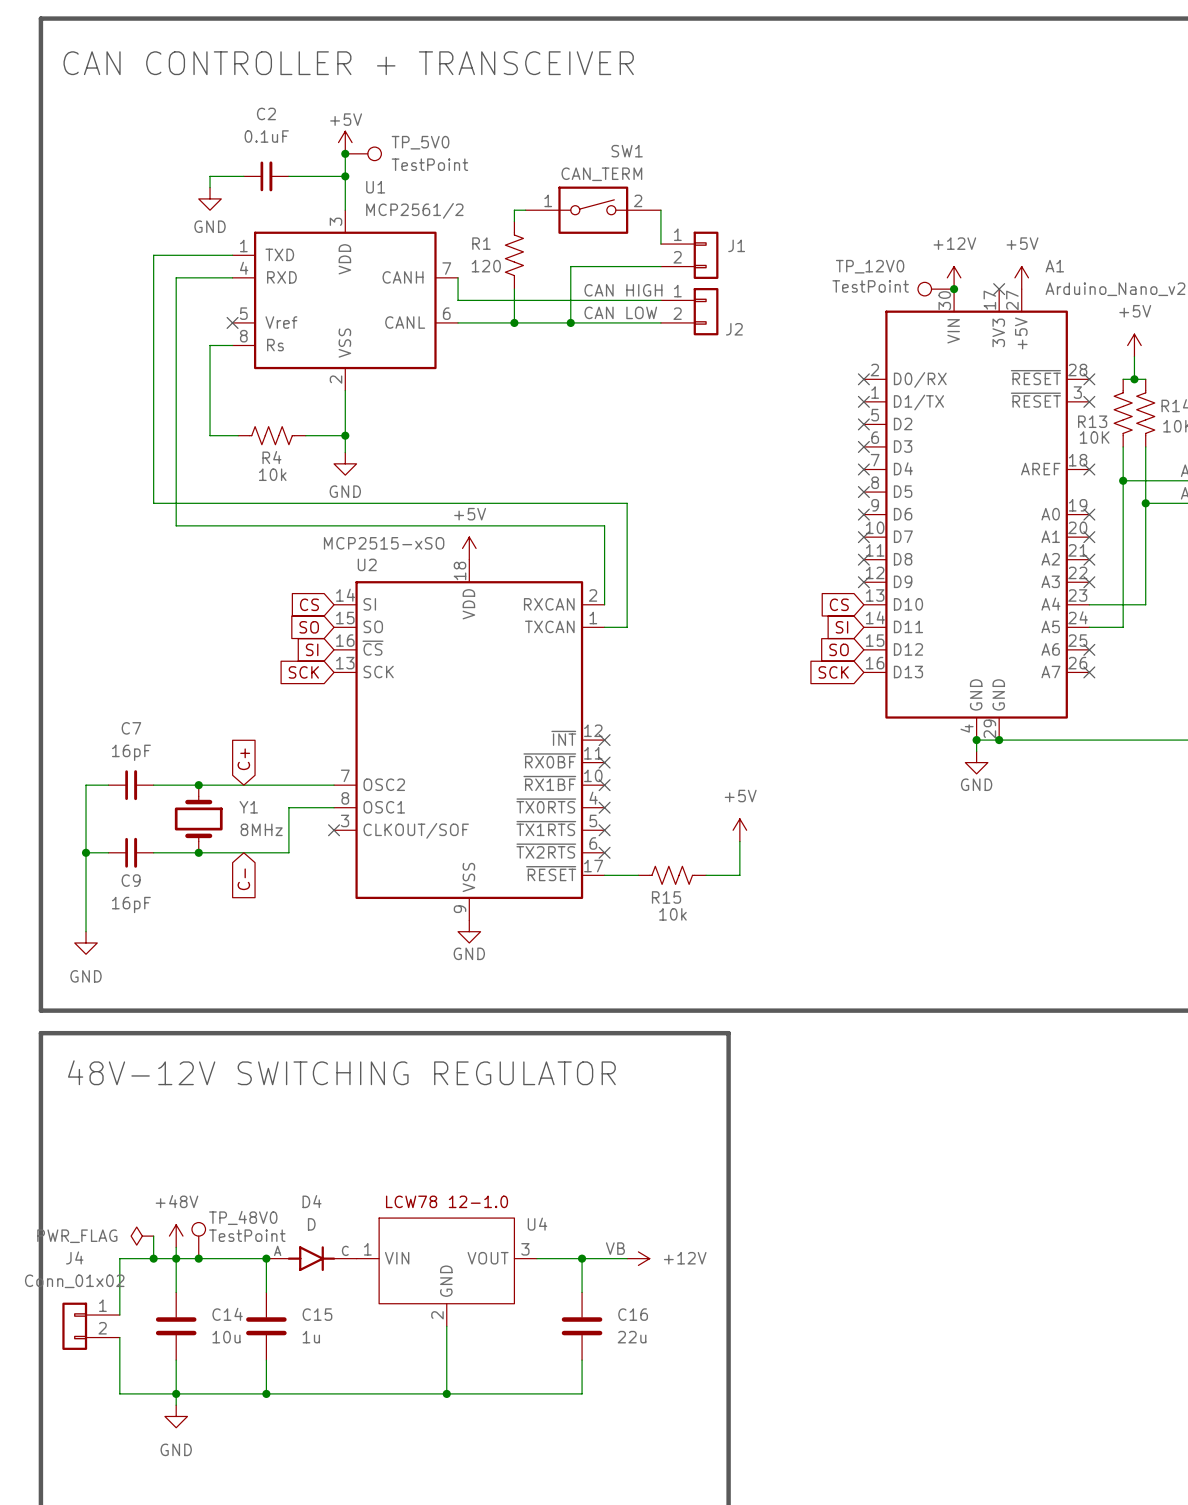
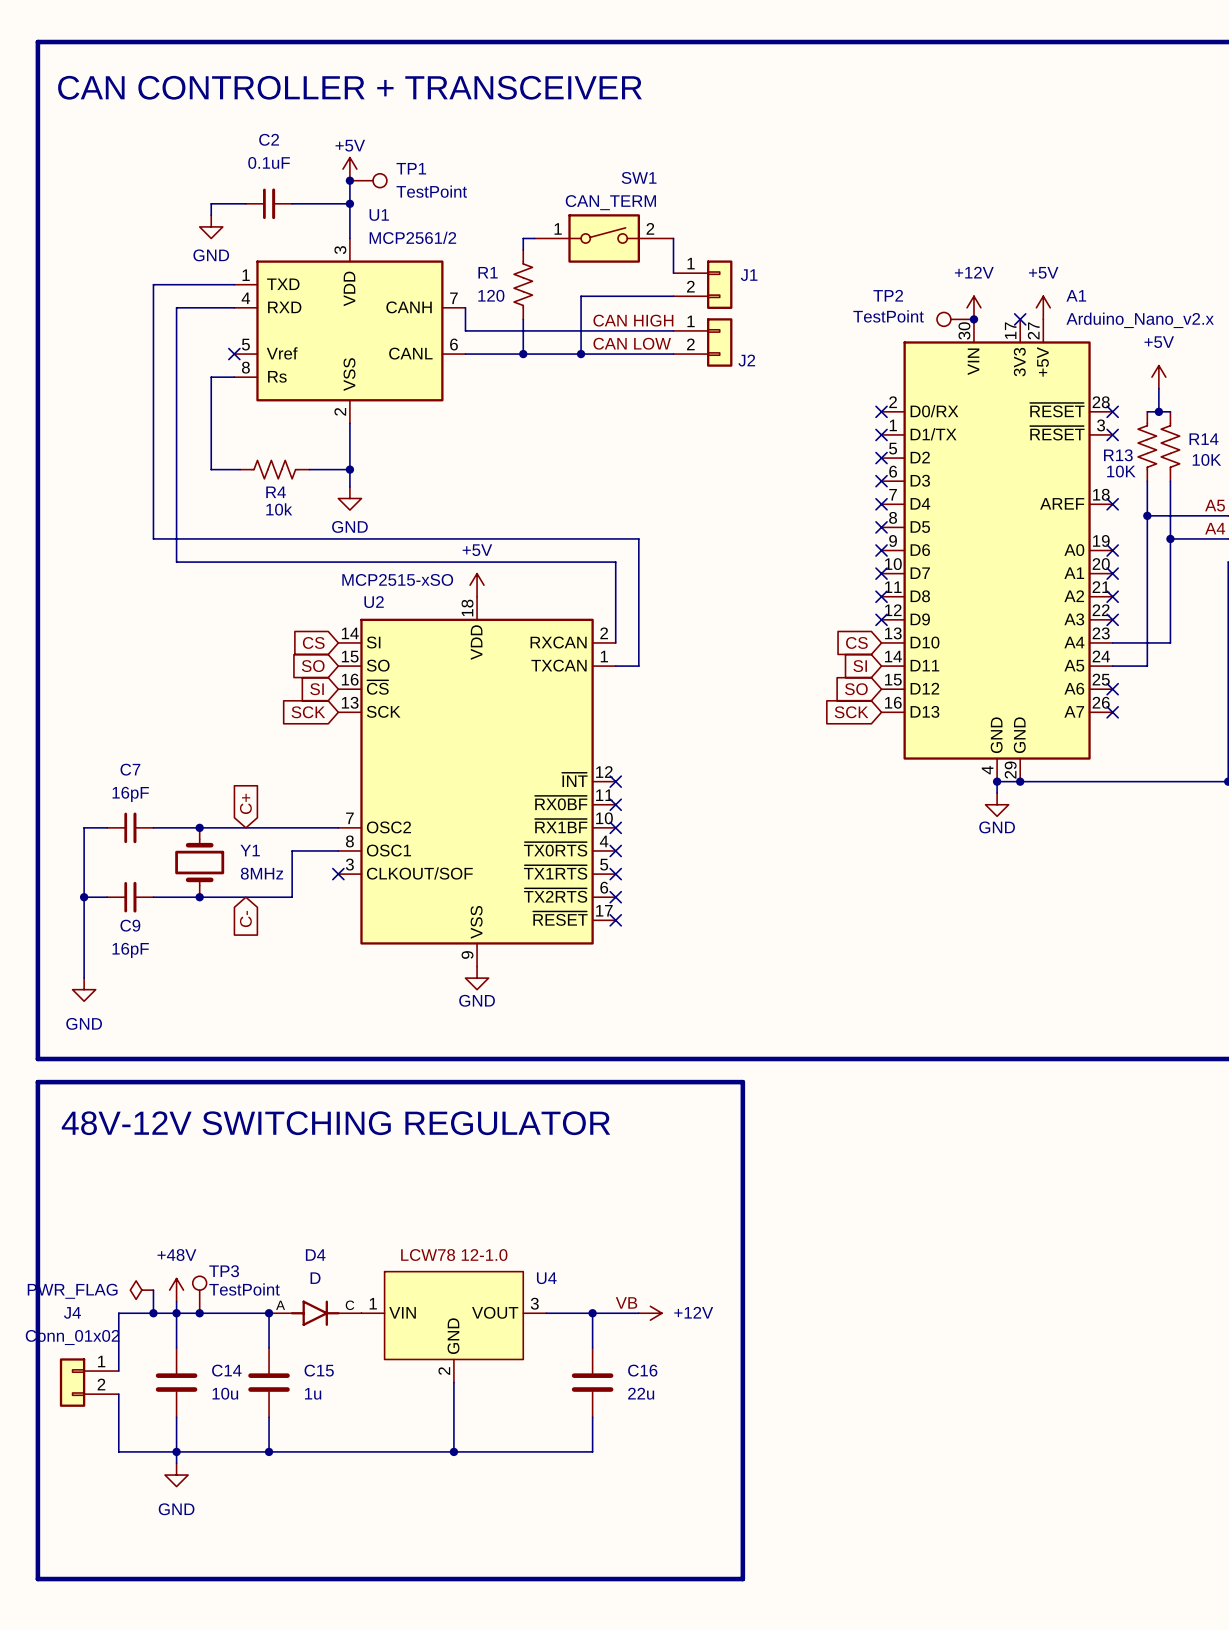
TP_5V0 name: TP_5V0 (420, 142) -> TP1 (411, 168)
TP_12V0 name: TP_12V0 (870, 266) -> TP2 (888, 295)
power symbol: +5V (739, 830) -> none
wire: (739, 841) (739, 875) (706, 875) -> none
wire: (604, 875) (638, 875) -> none
no-connect mark: none -> (615, 920)
R15: 10k (672, 875) -> none
TP_48V0 name: TP_48V0 (243, 1217) -> TP3 (224, 1271)

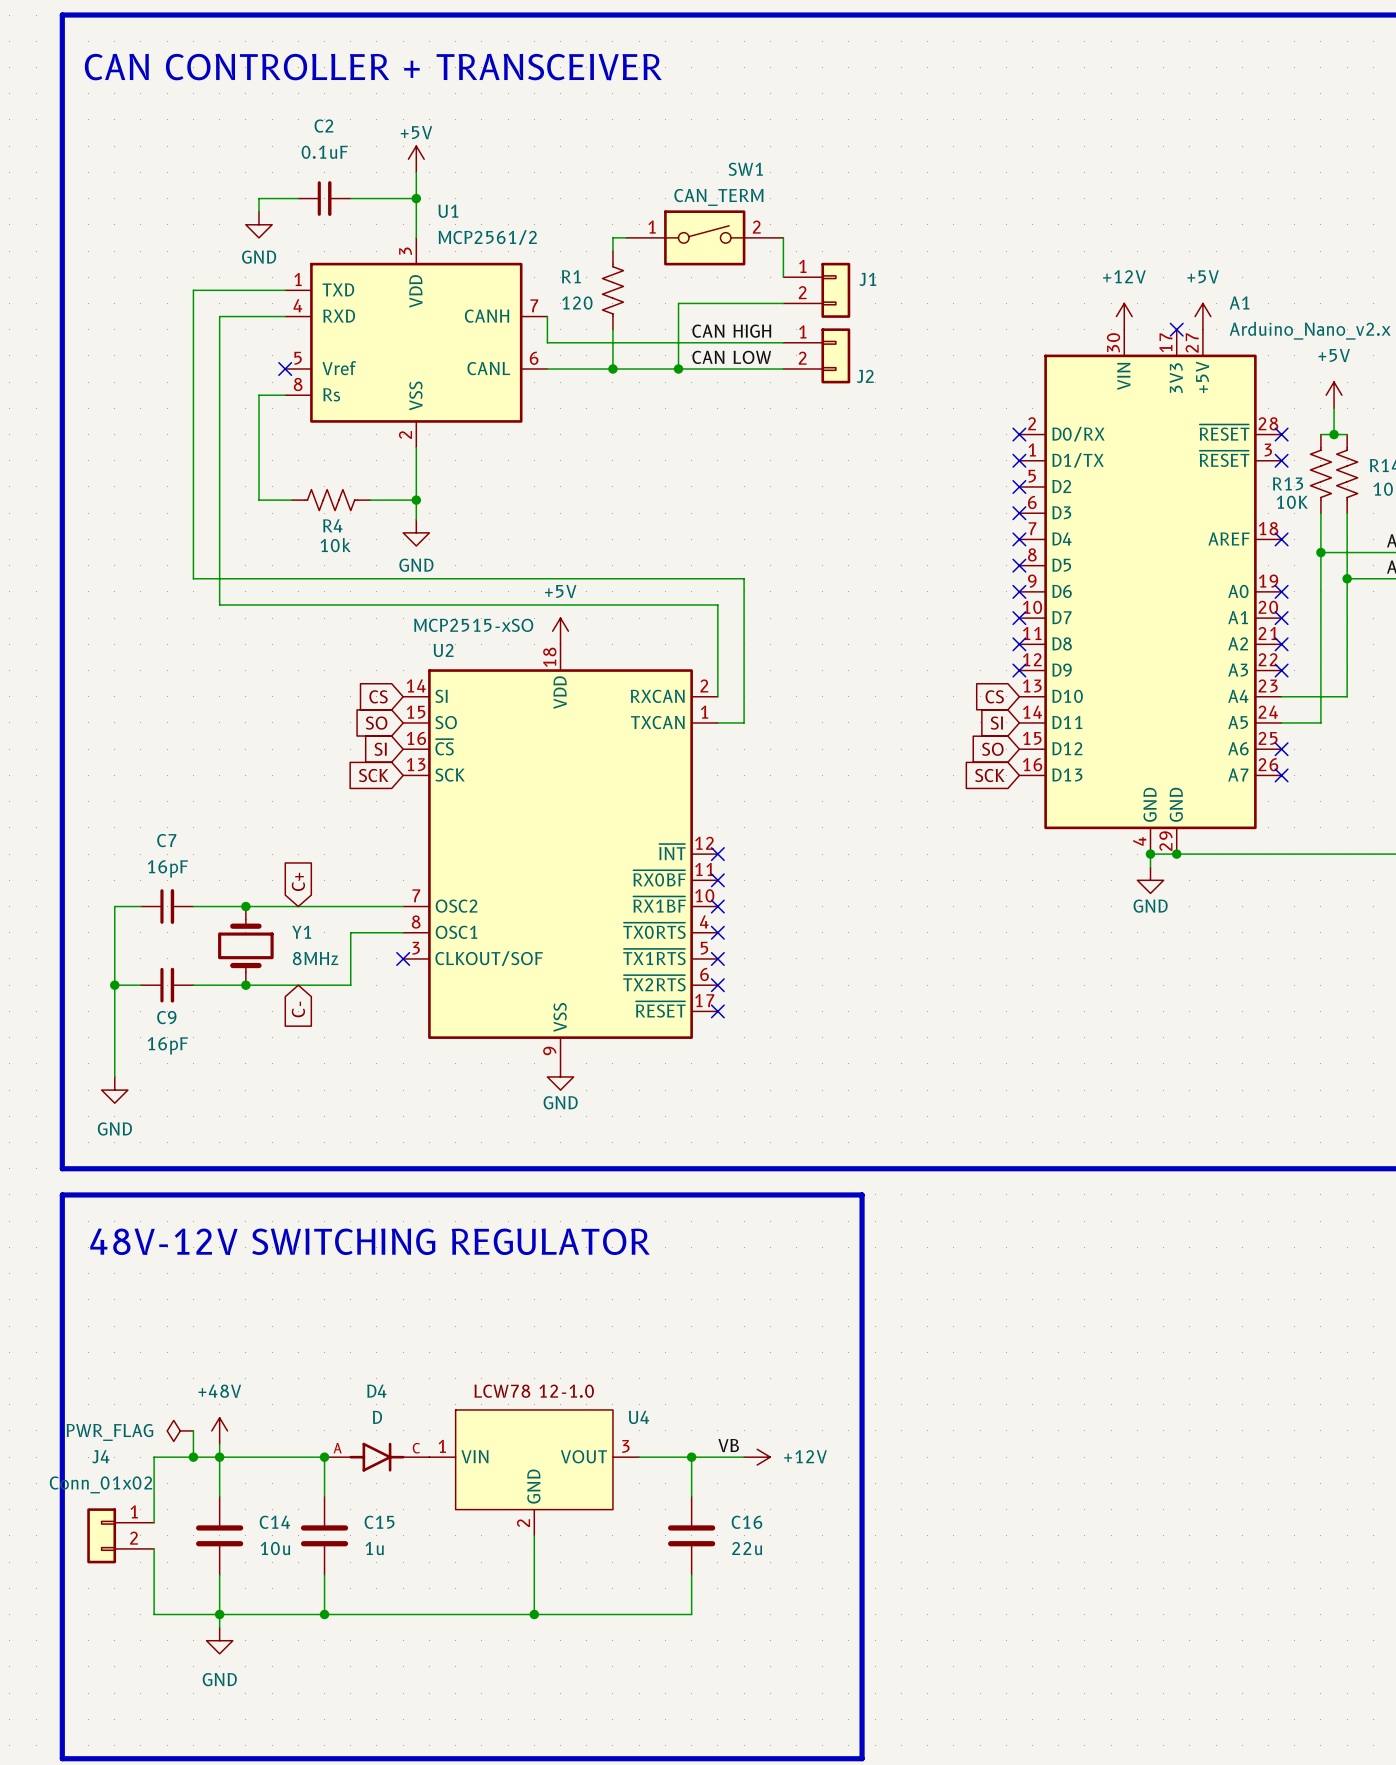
junction: (349, 180) -> none
TP1: TestPoint (368, 180) -> none
TP2: TestPoint (955, 319) -> none
junction: (973, 319) -> none
TP3: TestPoint (199, 1294) -> none
junction: (199, 1313) -> none

